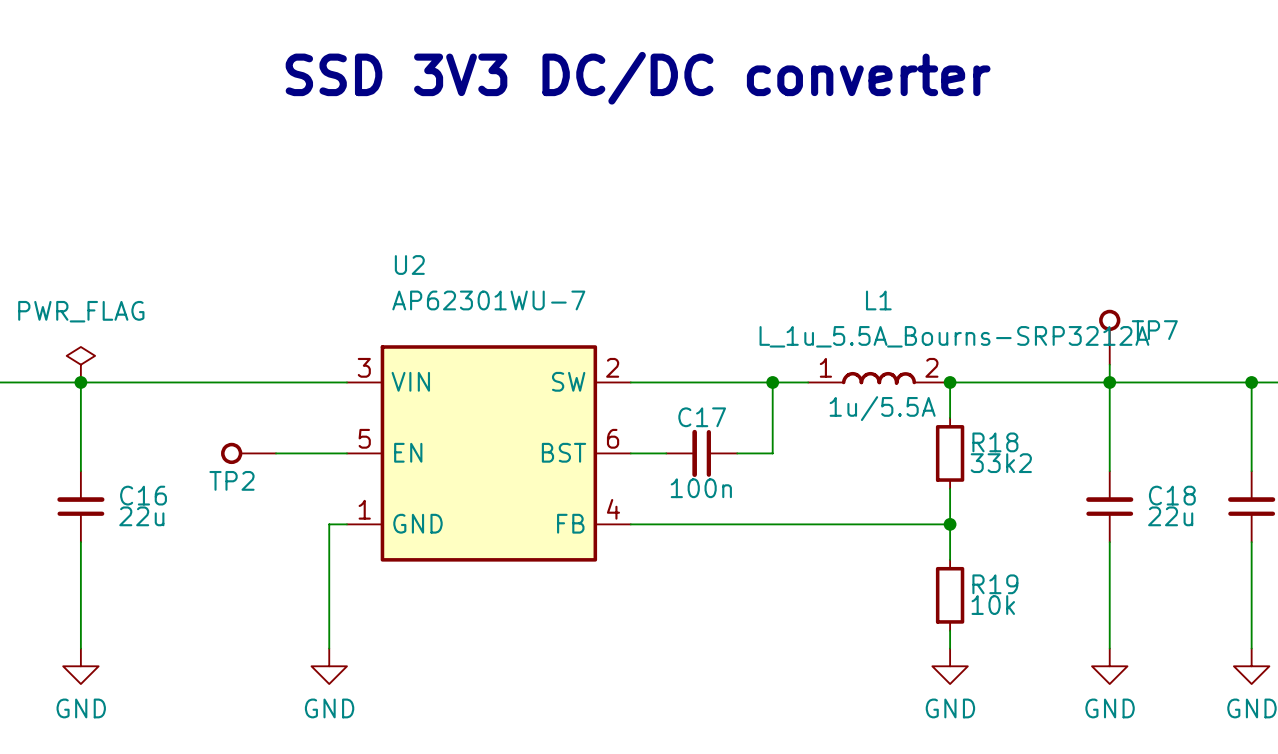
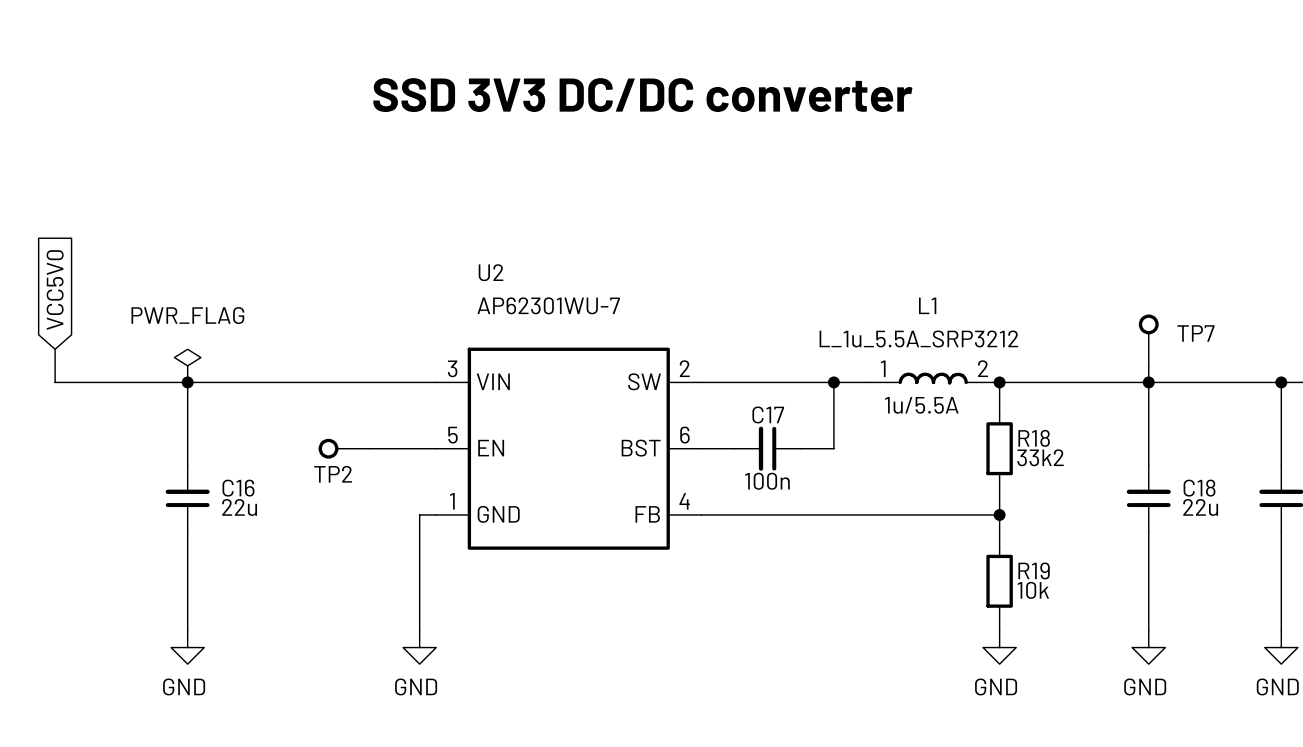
L1 value: L_1u_5.5A_Bourns-SRP3212A (954, 336) -> L_1u_5.5A_SRP3212 (918, 338)

